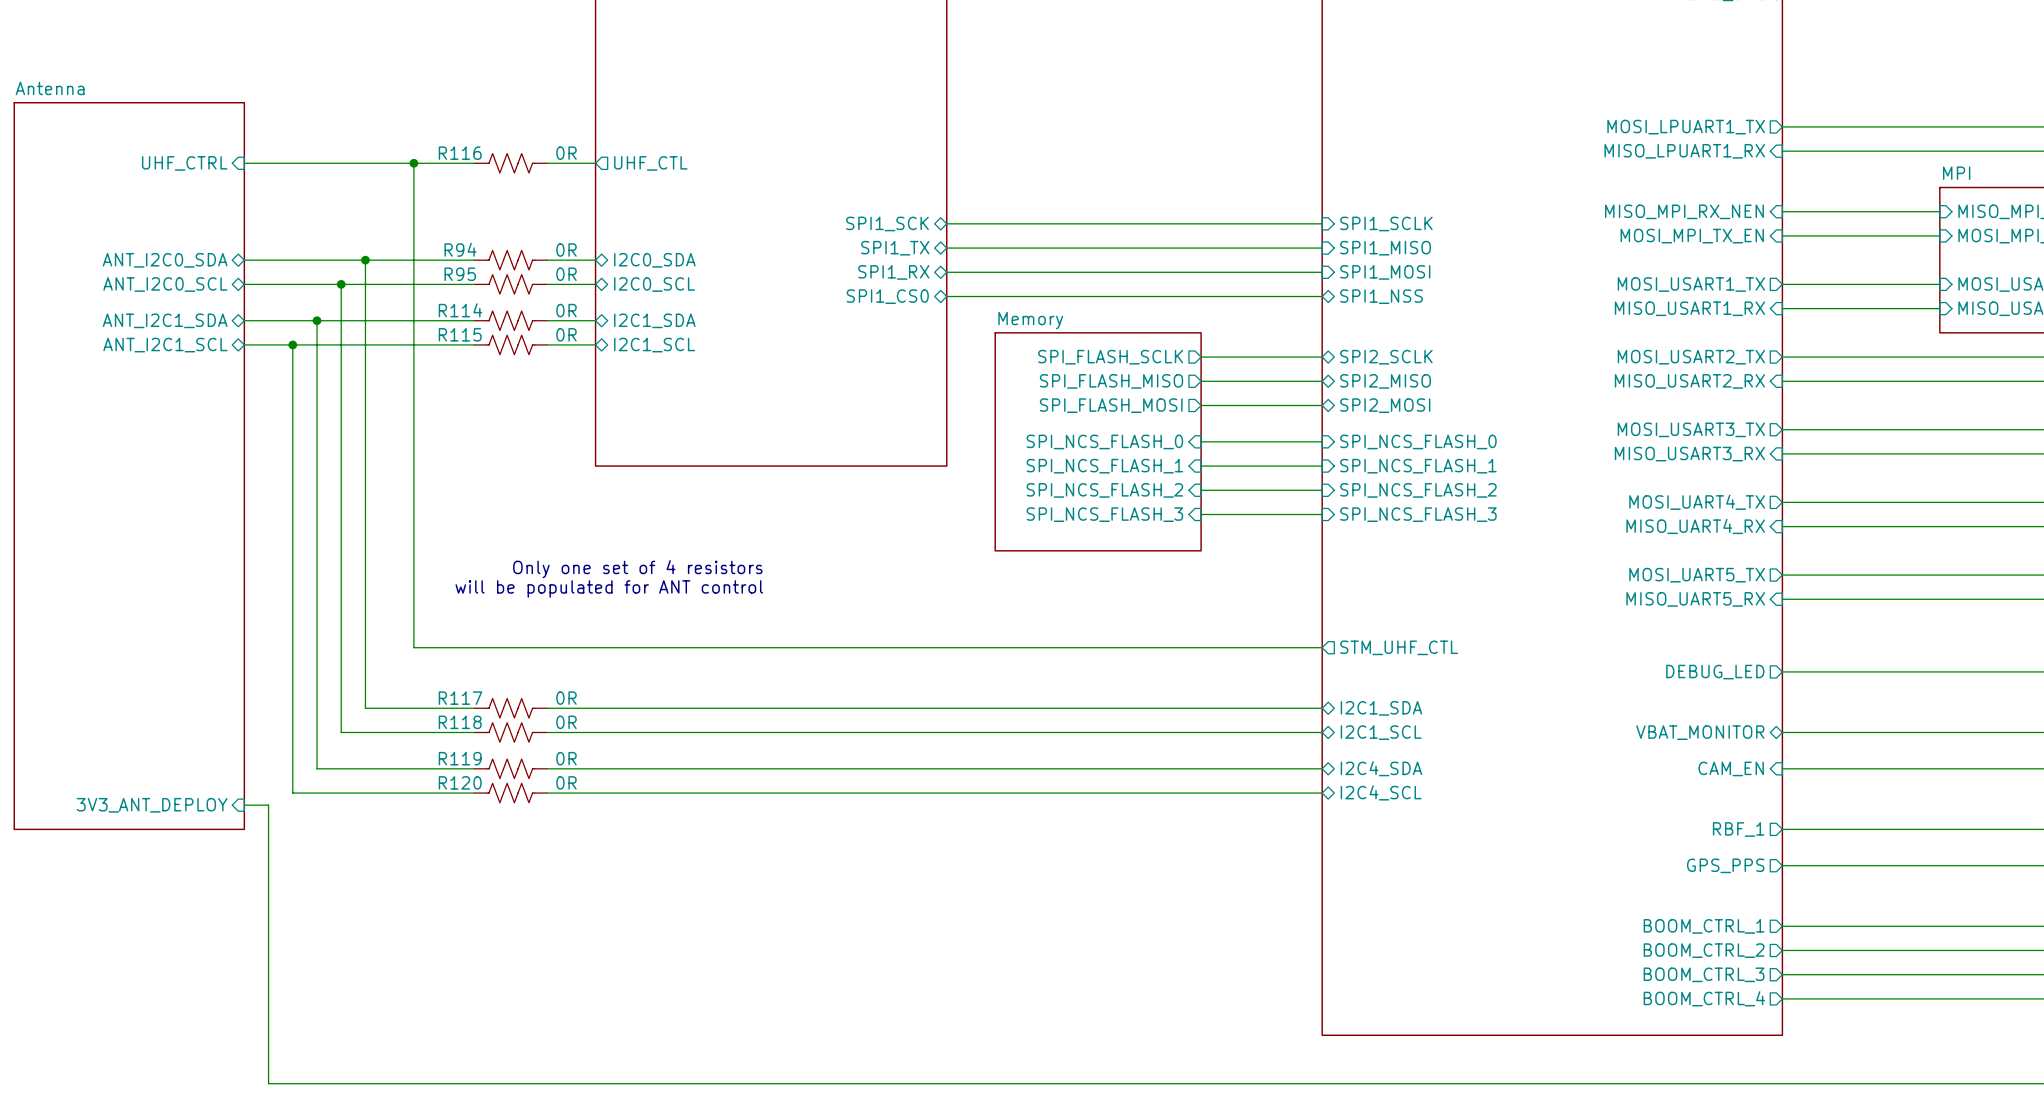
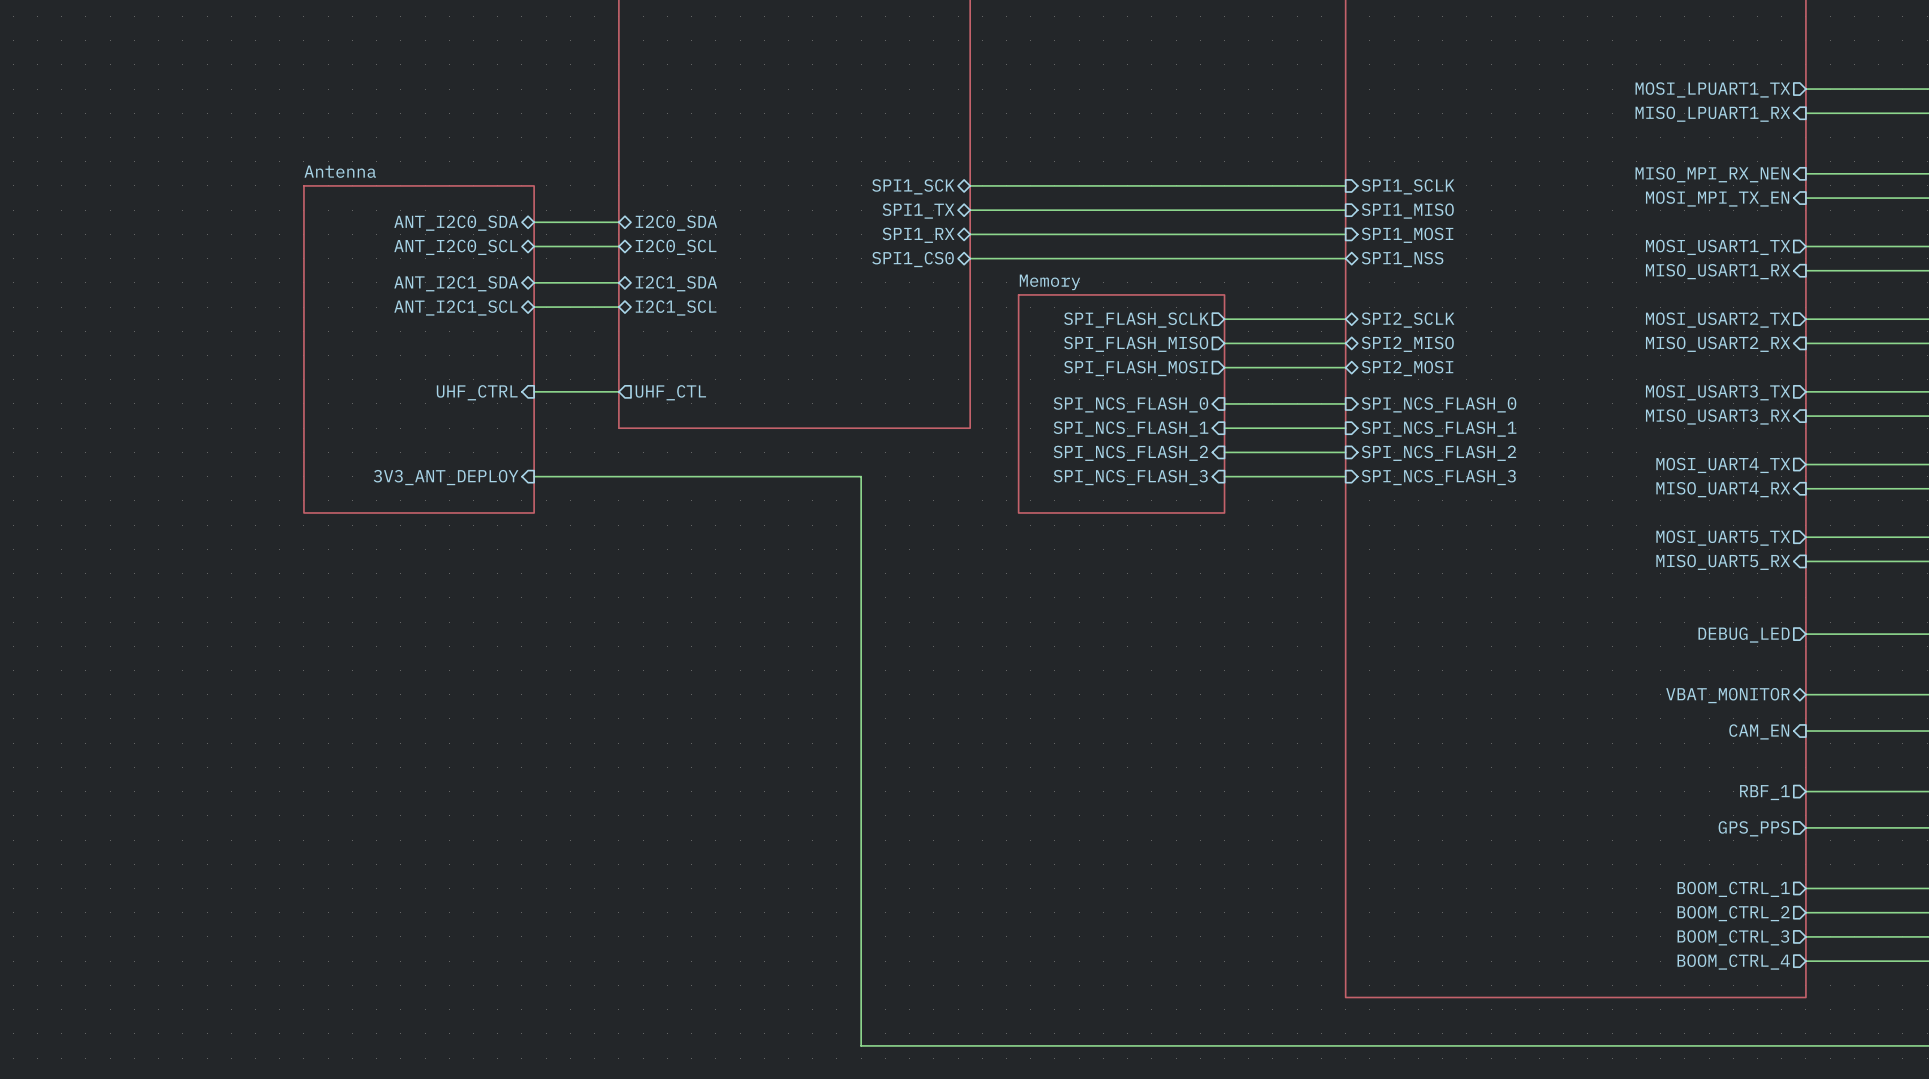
sheet pin: UHF_CTRL (184, 163) -> none
wire: (244, 163) (474, 163) -> none
wire: (413, 163) (413, 647) (1322, 647) -> none
junction: (413, 163) -> none
R116: 0R (510, 163) -> none
wire: (547, 163) (595, 163) -> none
sheet pin: UHF_CTL (650, 163) -> none
sheet pin: ANT_I2C0_SDA (165, 260) -> none
wire: (244, 260) (474, 260) -> none
wire: (365, 260) (365, 708) (474, 708) -> none
junction: (365, 260) -> none
sheet pin: none -> ANT_I2C0_SDA (456, 223)
R94: 0R (510, 260) -> none
sheet pin: ANT_I2C0_SCL (165, 284) -> none
wire: (244, 284) (474, 284) -> none
wire: (341, 284) (341, 732) (474, 732) -> none
junction: (341, 284) -> none
sheet pin: none -> ANT_I2C0_SCL (455, 247)
R95: 0R (510, 284) -> none
sheet pin: ANT_I2C1_SDA (165, 320) -> none
wire: (244, 320) (474, 320) -> none
wire: (317, 320) (317, 768) (474, 768) -> none
junction: (317, 320) -> none
sheet pin: none -> ANT_I2C1_SDA (456, 283)
R114: 0R (510, 320) -> none
wire: (244, 344) (474, 344) -> none
wire: (292, 344) (292, 793) (474, 793) -> none
junction: (292, 344) -> none
R115: 0R (510, 344) -> none
sheet pin: ANT_I2C1_SCL (165, 345) -> none
sheet pin: none -> ANT_I2C1_SCL (455, 307)
sheet Antenna: none -> (419, 349)
sheet pin: none -> UHF_CTRL (477, 392)
wire: none -> (534, 391) (618, 391)
sheet pin: none -> UHF_CTL (670, 392)
sheet Antenna: (129, 466) -> none
sheet pin: none -> 3V3_ANT_DEPLOY (446, 477)
text: Only one set of 4 resistors (637, 569) -> none
text: will be populated for ANT control (609, 588) -> none
sheet pin: STM_UHF_CTL (1399, 647) -> none
R117: 0R (510, 708) -> none
wire: (547, 708) (1322, 708) -> none
sheet pin: I2C1_SDA (1381, 708) -> none
R118: 0R (510, 732) -> none
wire: (547, 732) (1322, 732) -> none
sheet pin: I2C1_SCL (1381, 732) -> none
R119: 0R (510, 768) -> none
wire: (547, 768) (1322, 768) -> none
sheet pin: I2C4_SDA (1381, 768) -> none
sheet pin: I2C4_SCL (1381, 792) -> none
R120: 0R (510, 793) -> none
wire: (547, 793) (1322, 793) -> none
sheet pin: 3V3_ANT_DEPLOY (152, 805) -> none
wire: (244, 805) (268, 805) (268, 1083) (837, 1083) -> (534, 476) (861, 476) (861, 1045)

